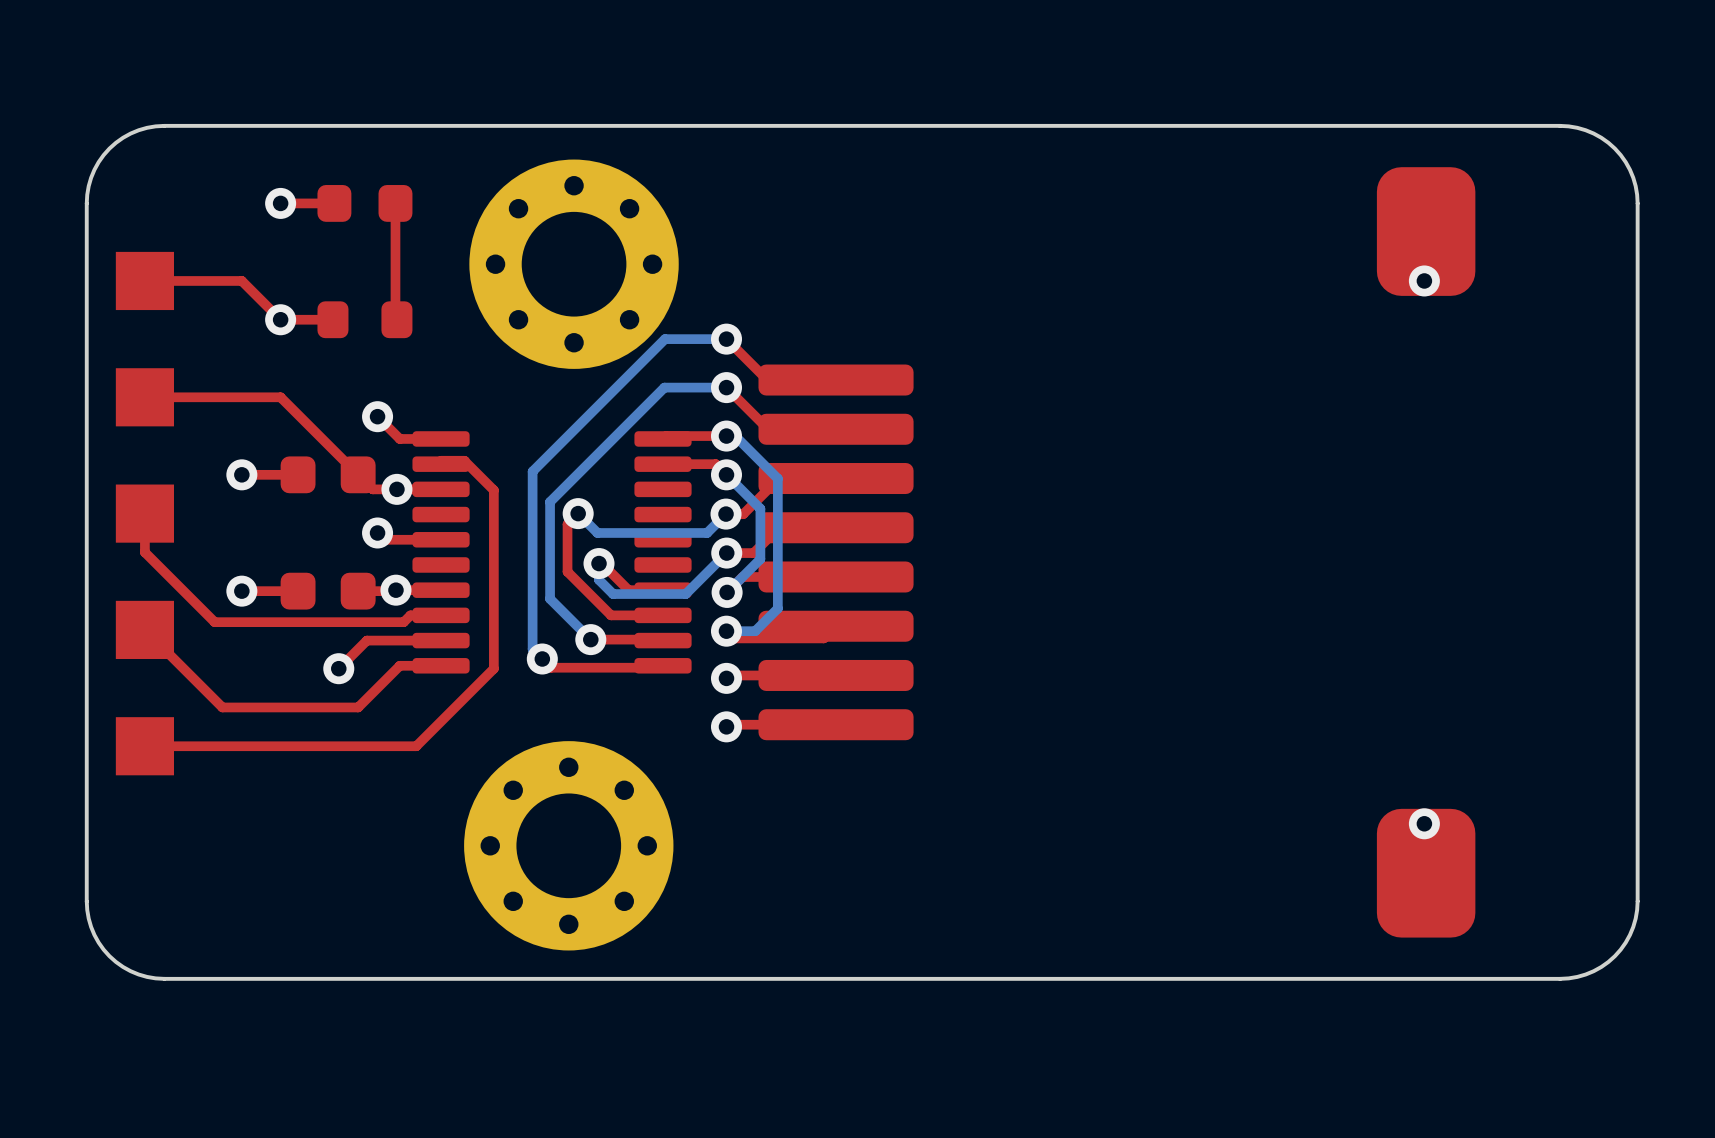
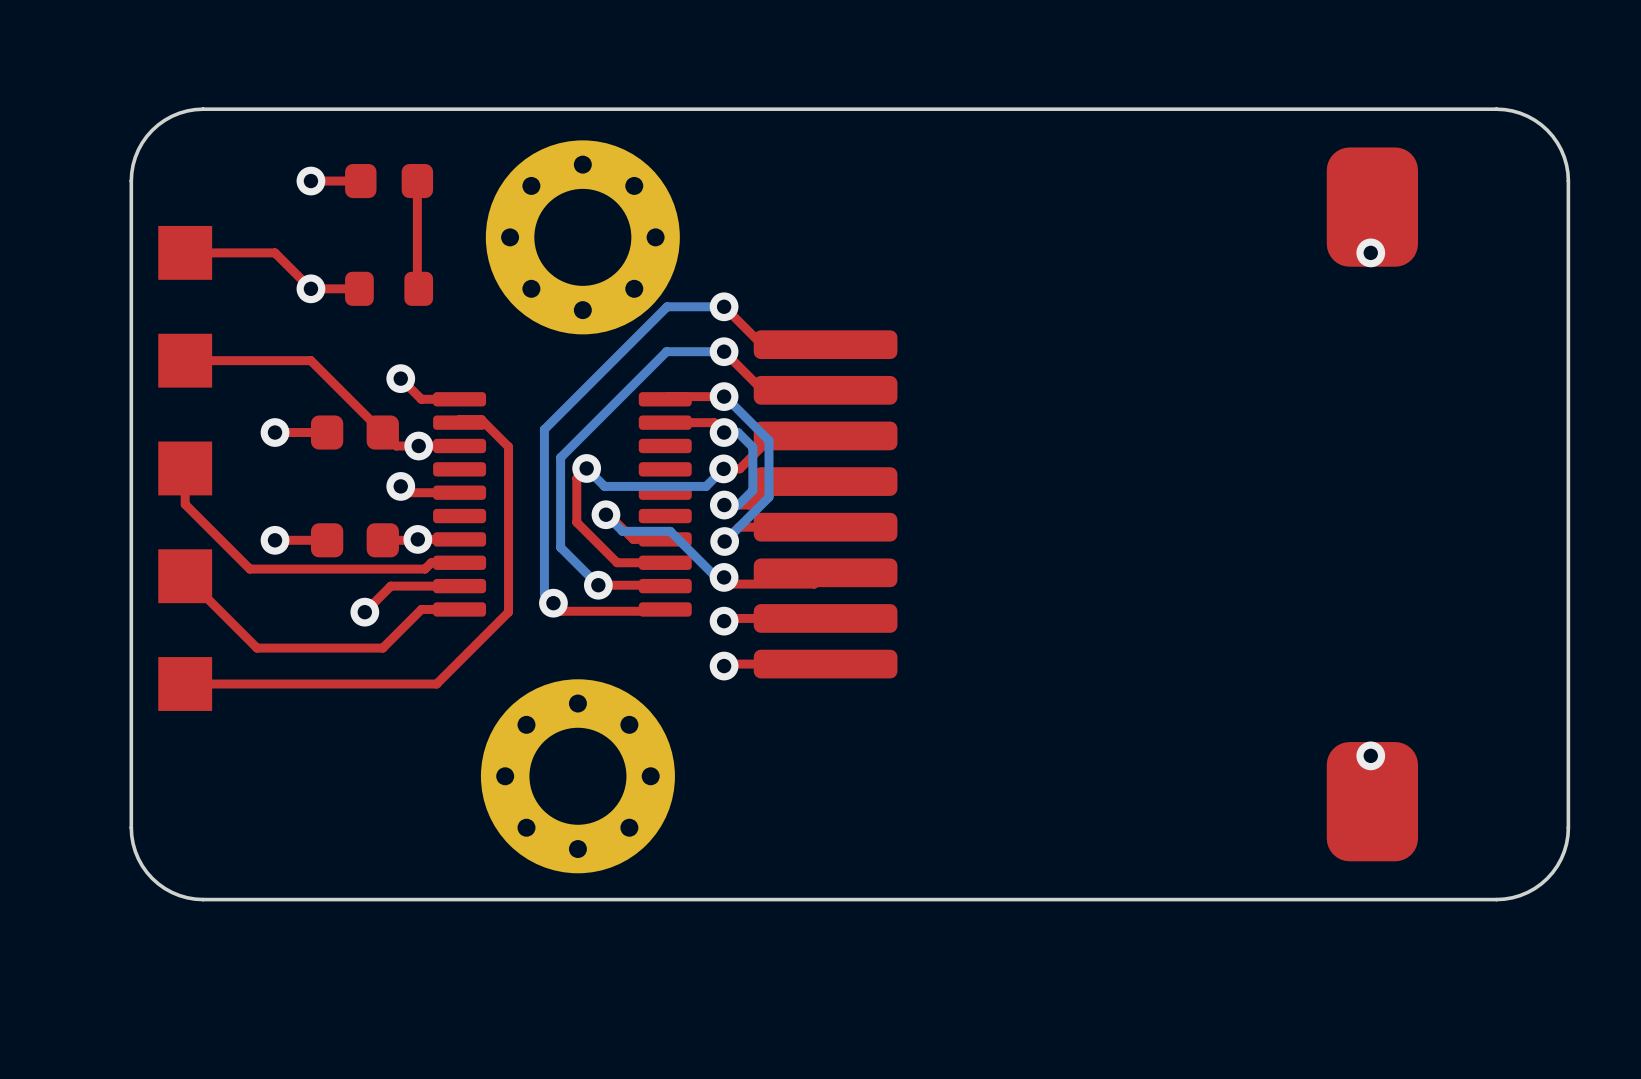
bottom track: (727, 436) (735, 436) (777, 478) (777, 608) (755, 631) (726, 631) -> (725, 396) (769, 440) (769, 497) (755, 510)
bottom track: (726, 474) (760, 508) (760, 559) -> (724, 432) (738, 432) (752, 447) (752, 490) (738, 505) (724, 505)
bottom track: (726, 553) (685, 594) (613, 594) (599, 579) (599, 563) -> (724, 577) (716, 577) (670, 531) (622, 531) (605, 514)

